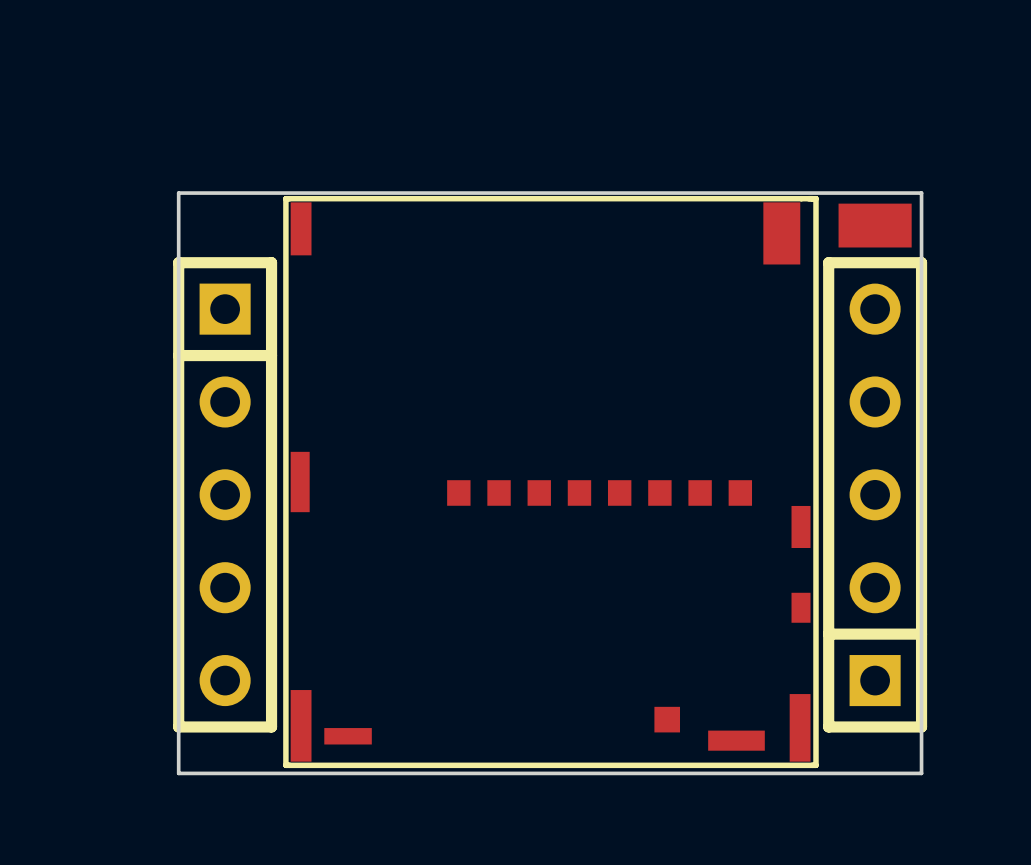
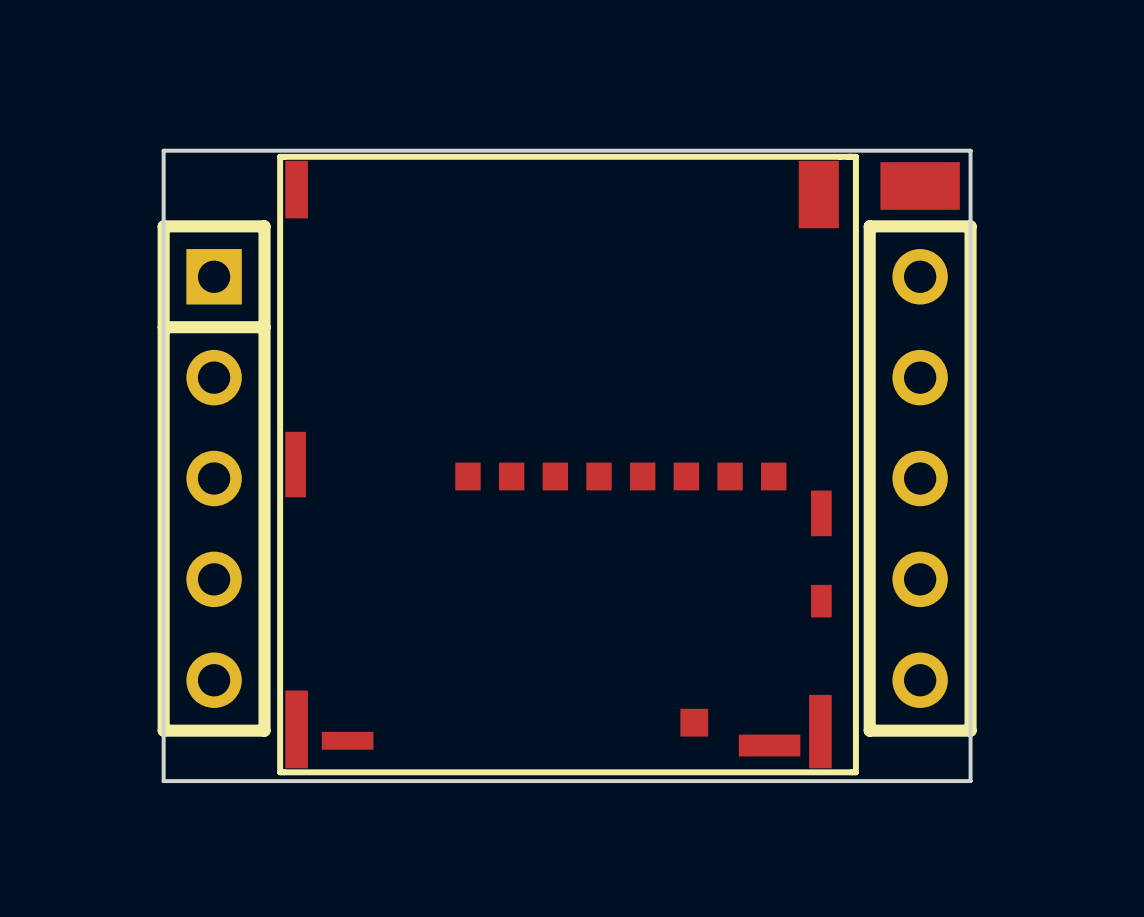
part footprint: [283, 195, 819, 769] -> [277, 153, 859, 776]
part footprint: [823, 257, 928, 733] -> [863, 220, 977, 737]

